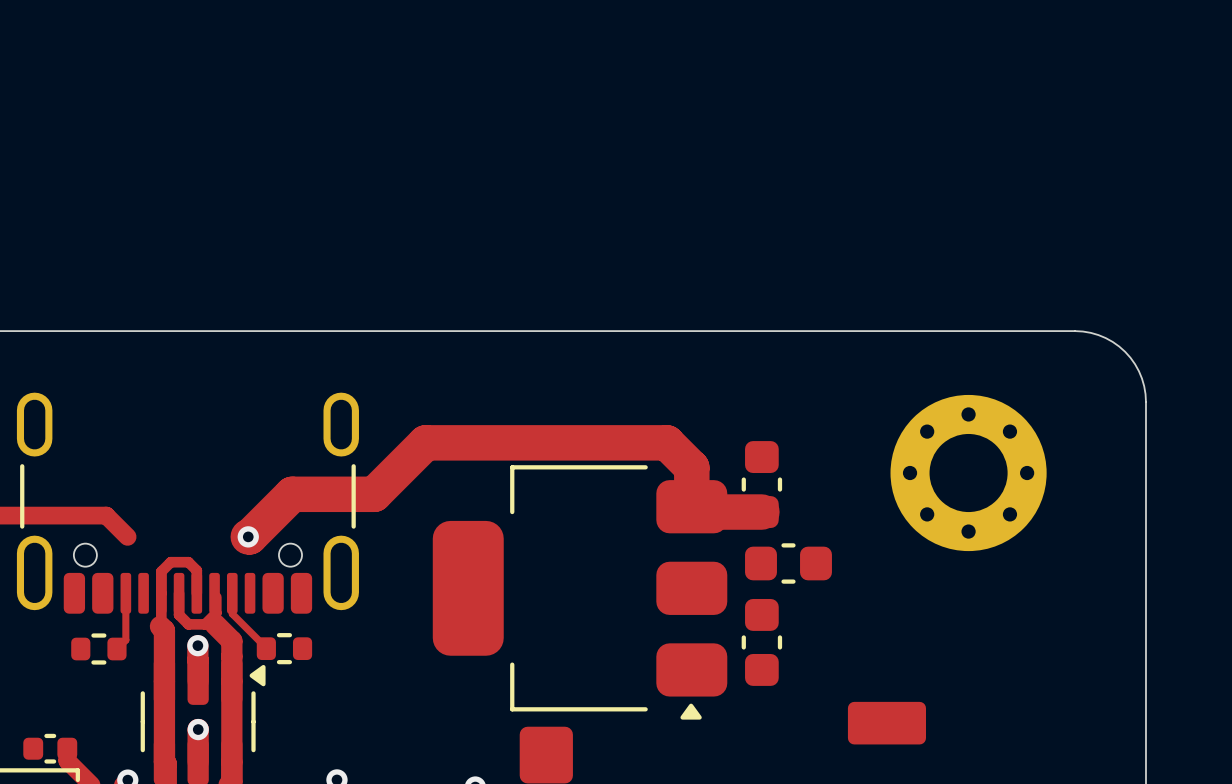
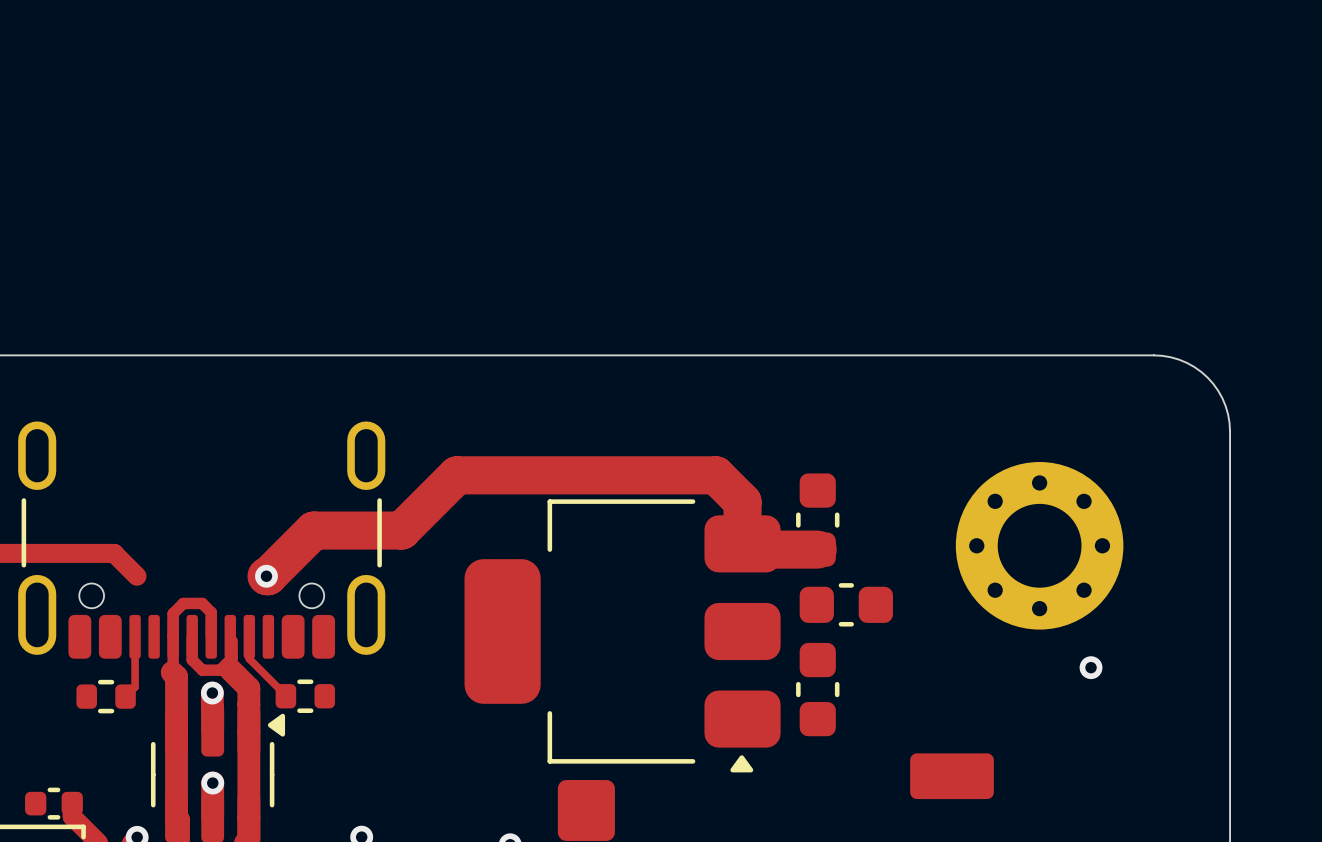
part position: (968, 473) -> (1039, 545)
via: none -> (1091, 667)

